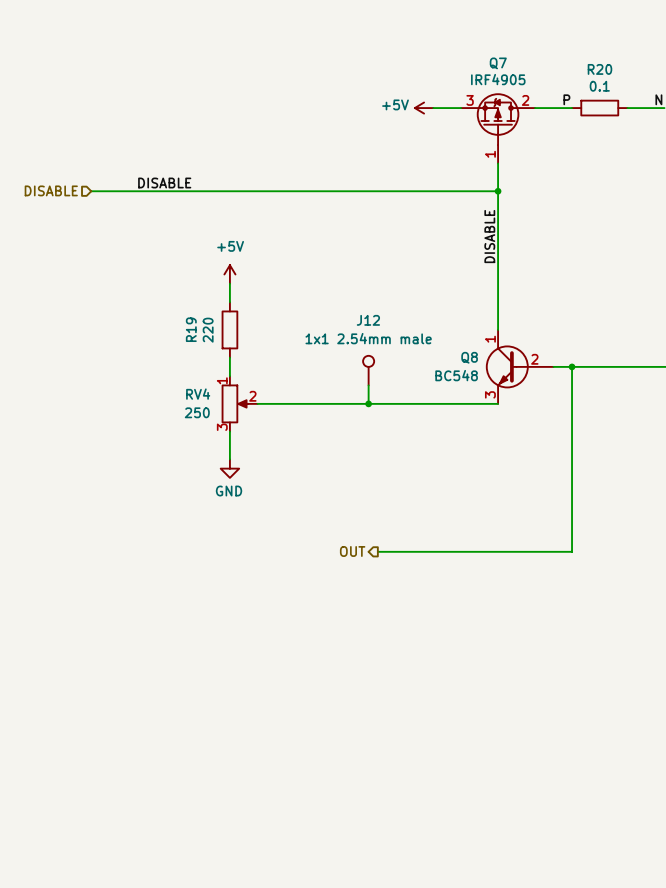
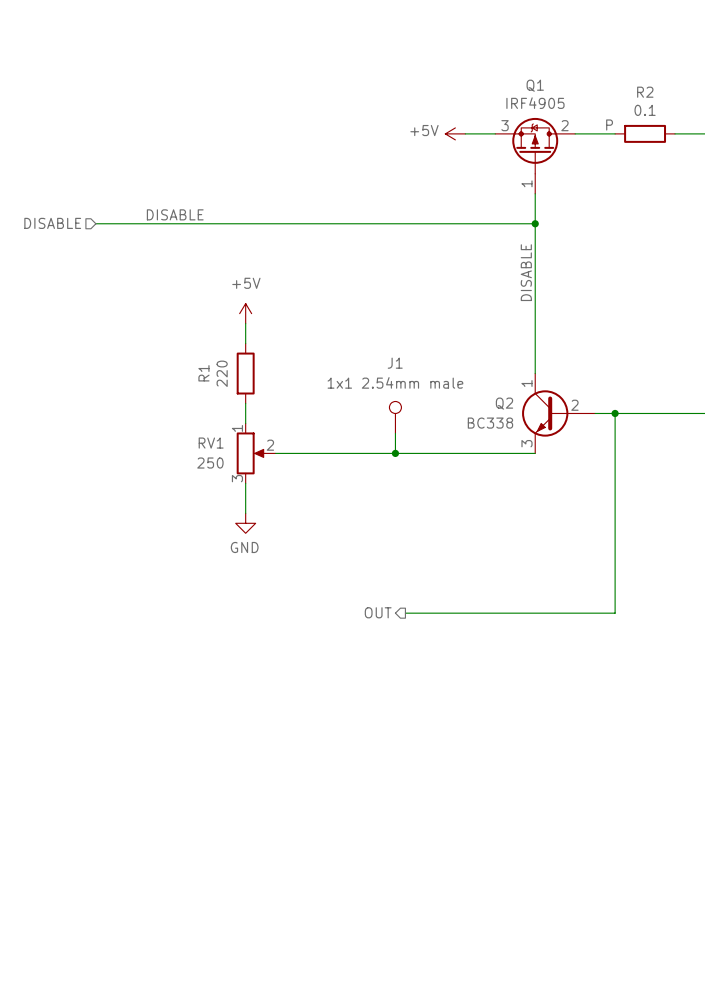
Q7 name: Q7 (498, 63) -> Q1 (535, 85)
R20 name: R20 (599, 69) -> R2 (645, 92)
J12 name: J12 (368, 320) -> J1 (395, 363)
R19 name: R19 (191, 329) -> R1 (203, 373)
Q8 name: Q8 (469, 357) -> Q2 (504, 403)
Q8 value: BC548 (456, 375) -> BC338 (490, 423)
RV4 name: RV4 (198, 394) -> RV1 (211, 443)

